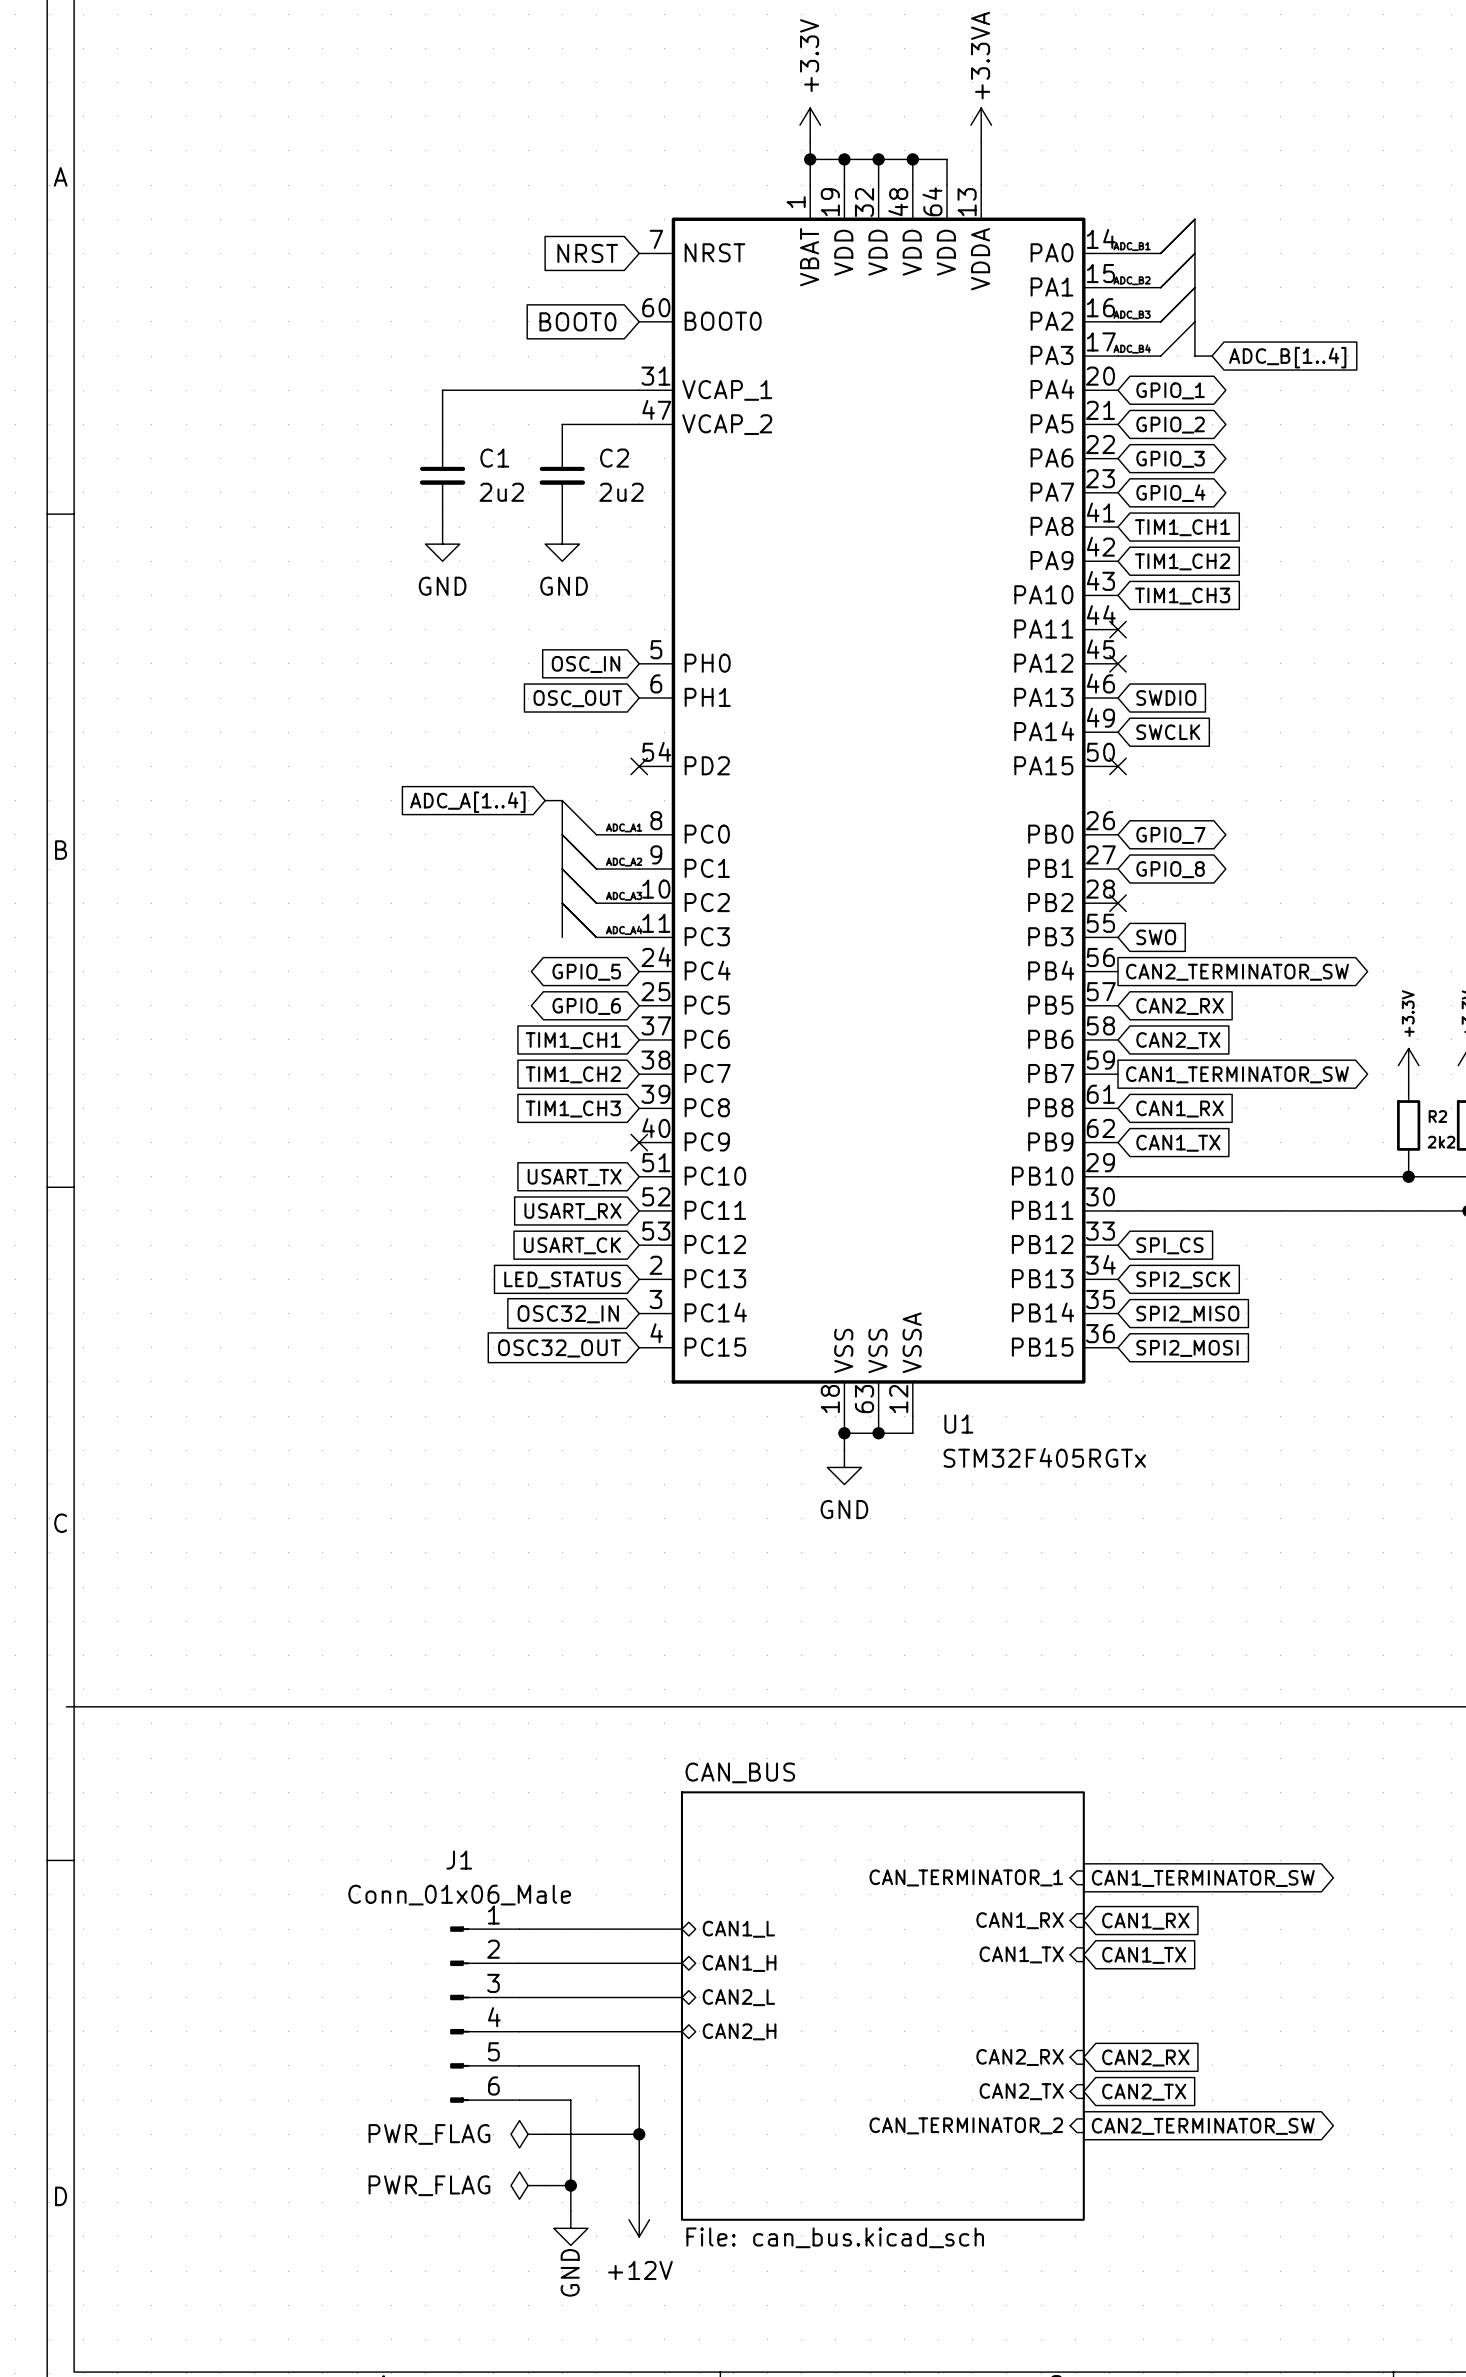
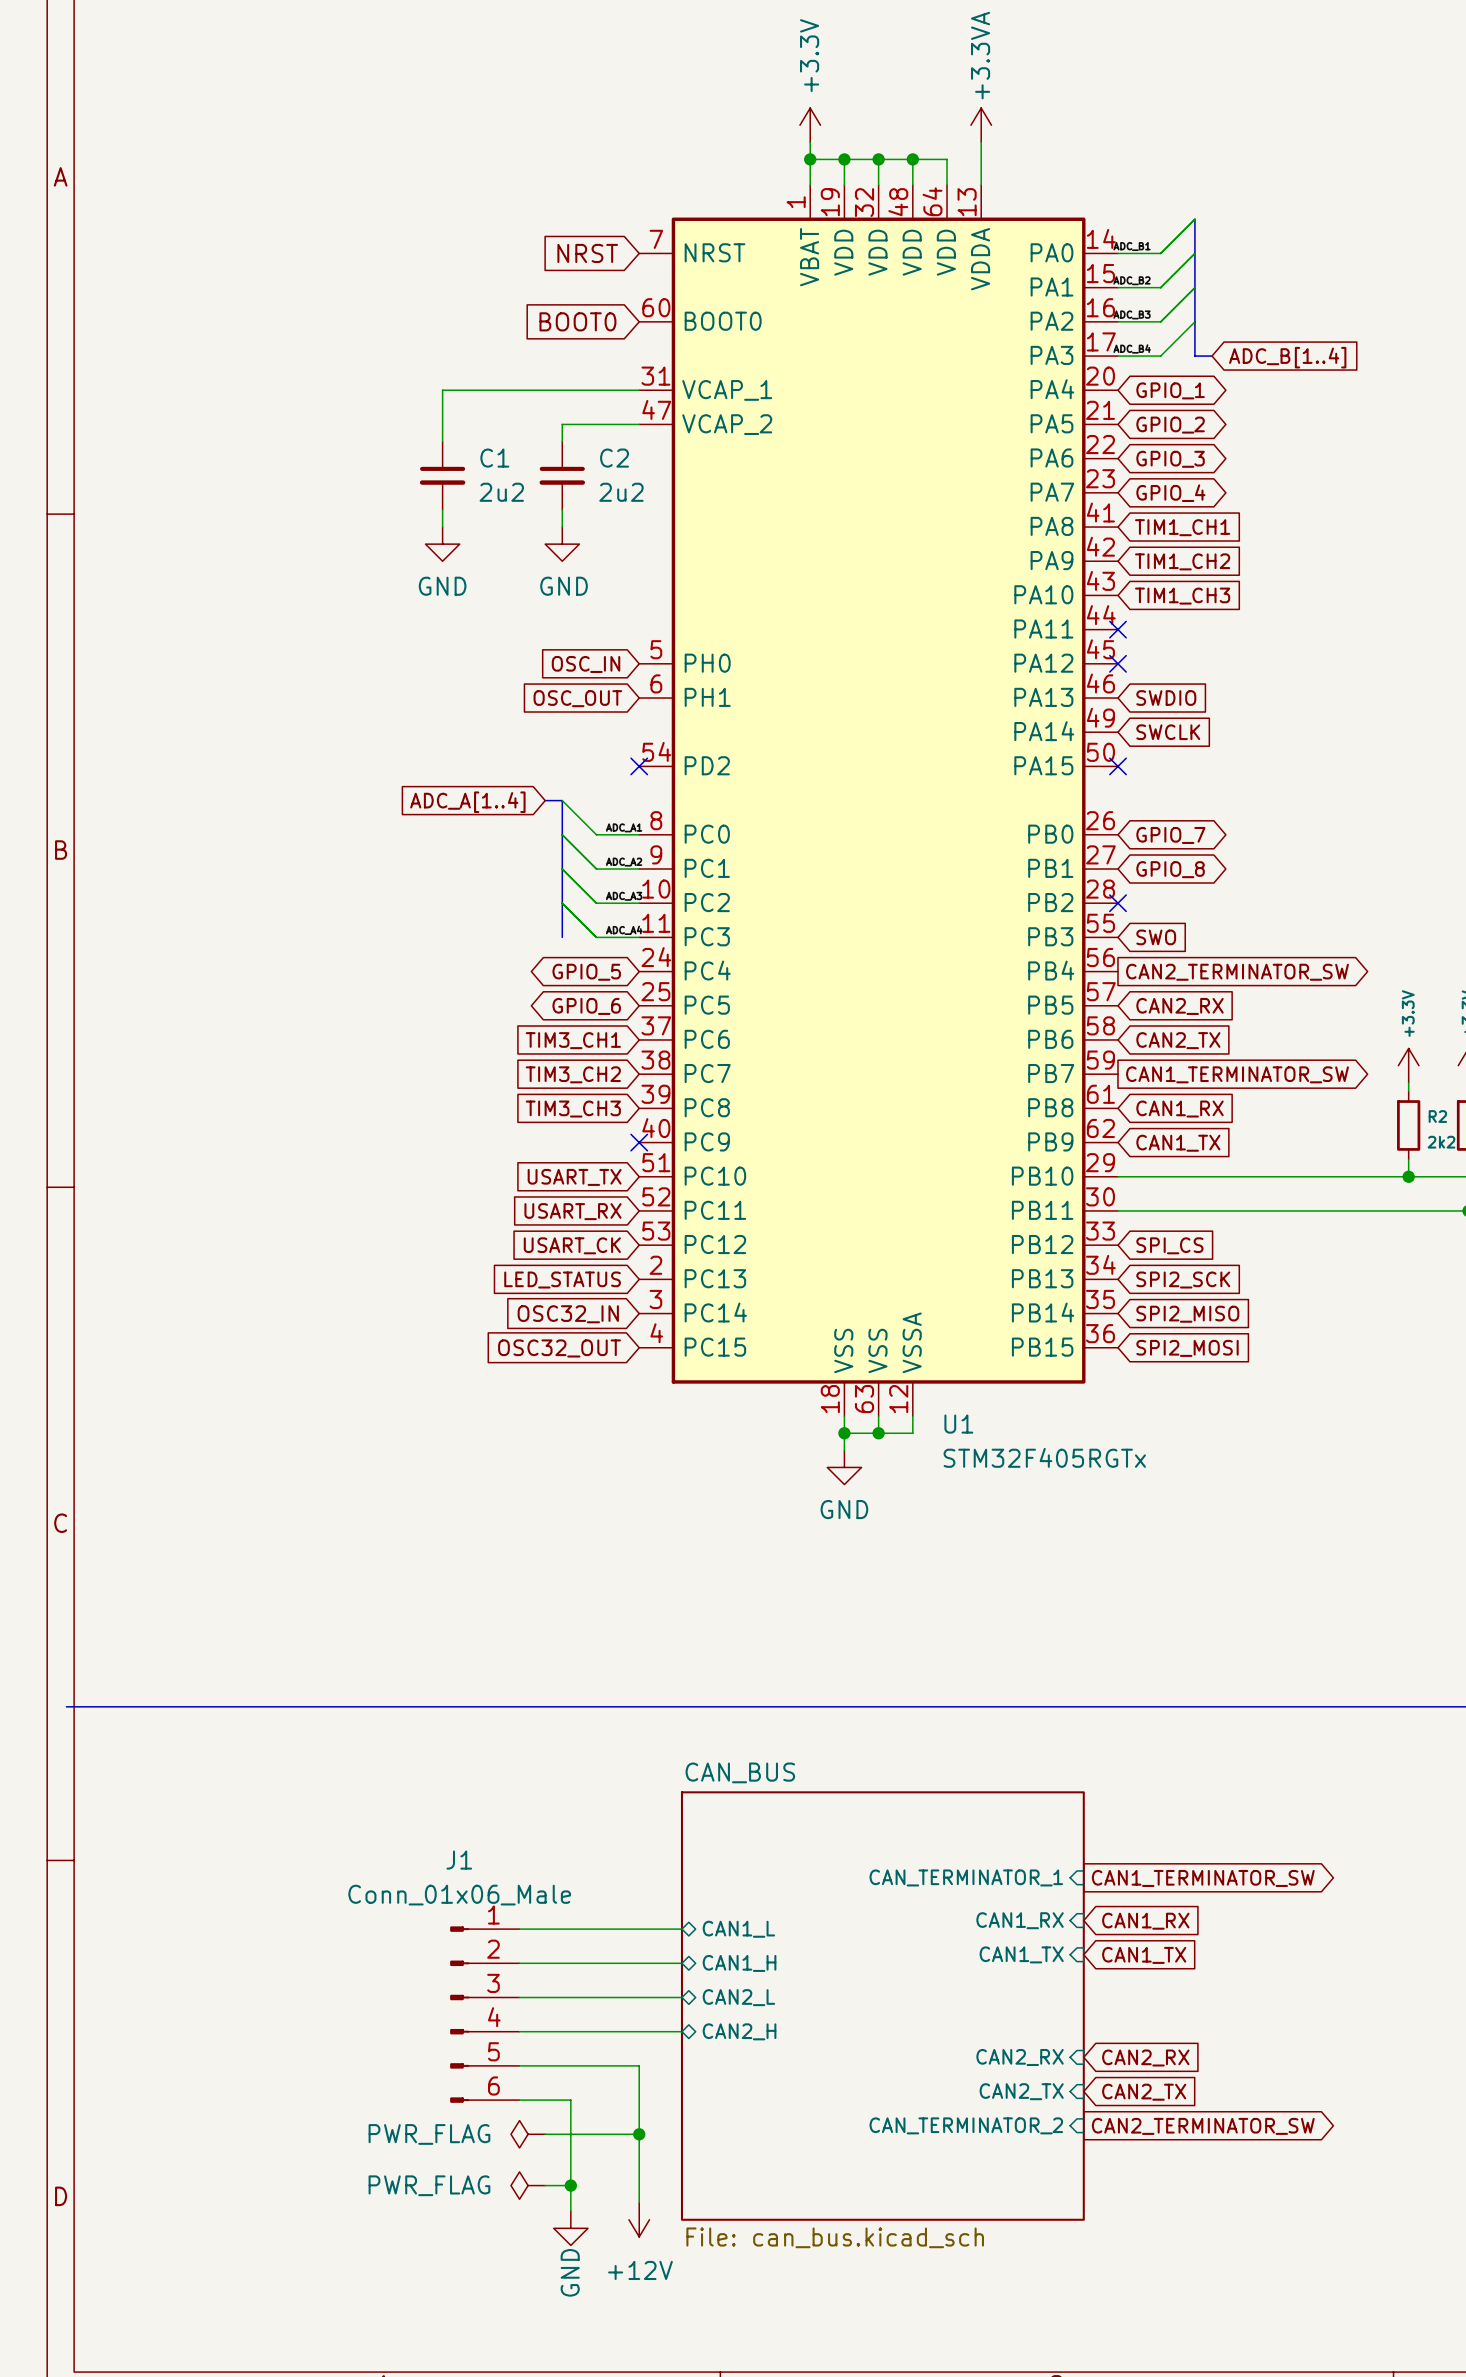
global label: TIM1_CH1 (573, 1040) -> TIM3_CH1 (573, 1040)
global label: TIM1_CH2 (573, 1074) -> TIM3_CH2 (573, 1074)
global label: TIM1_CH3 (573, 1109) -> TIM3_CH3 (573, 1109)

